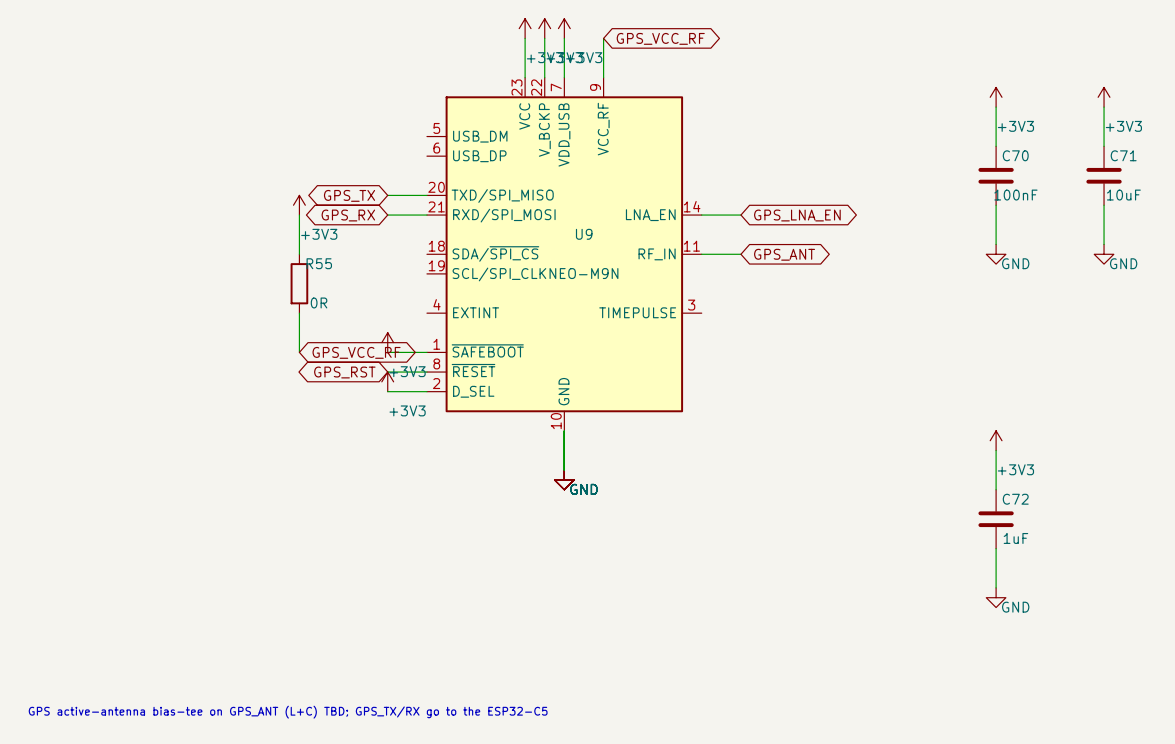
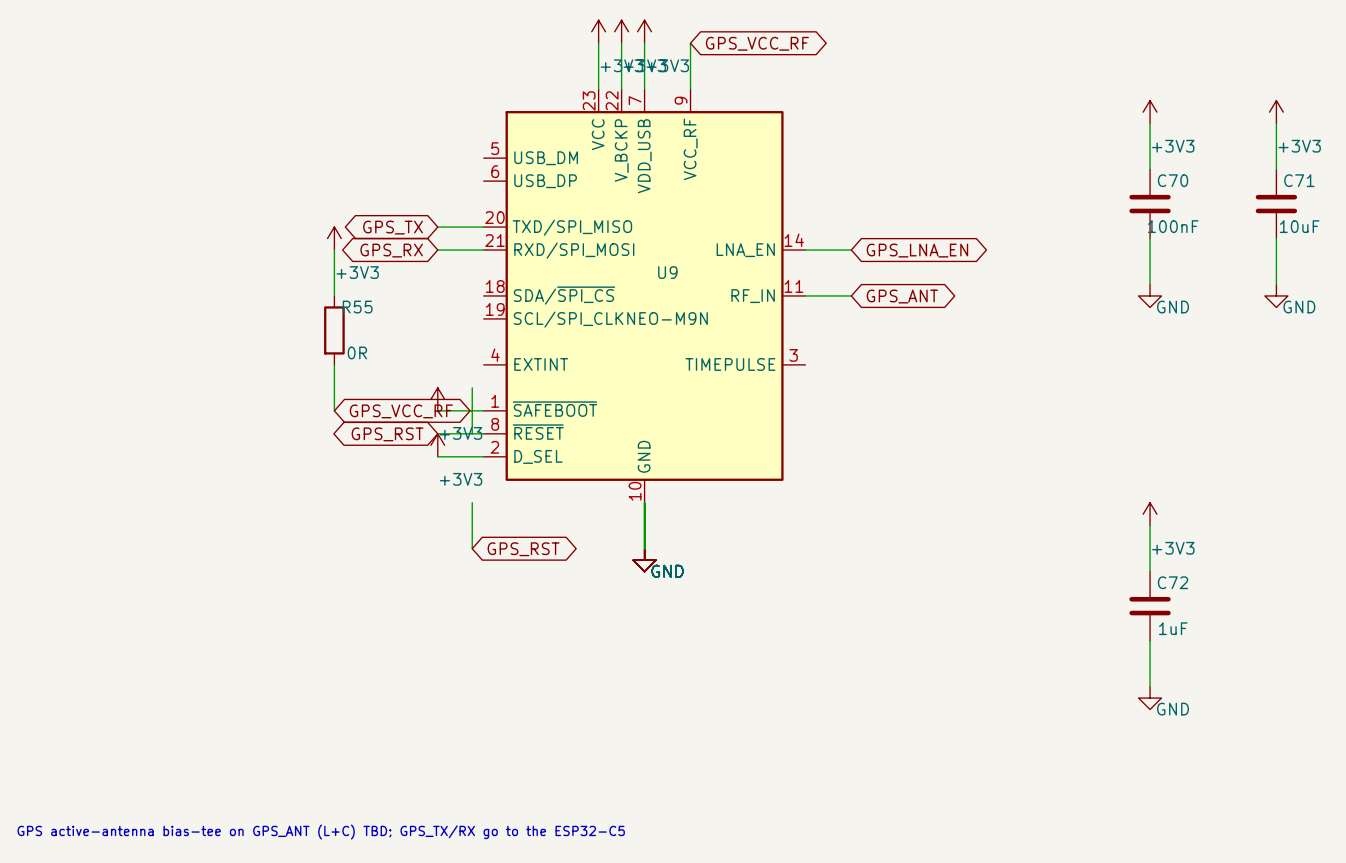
wire: none -> (472, 387) (472, 433)
wire: none -> (472, 502) (472, 548)
global label: none -> GPS_RST (523, 549)

